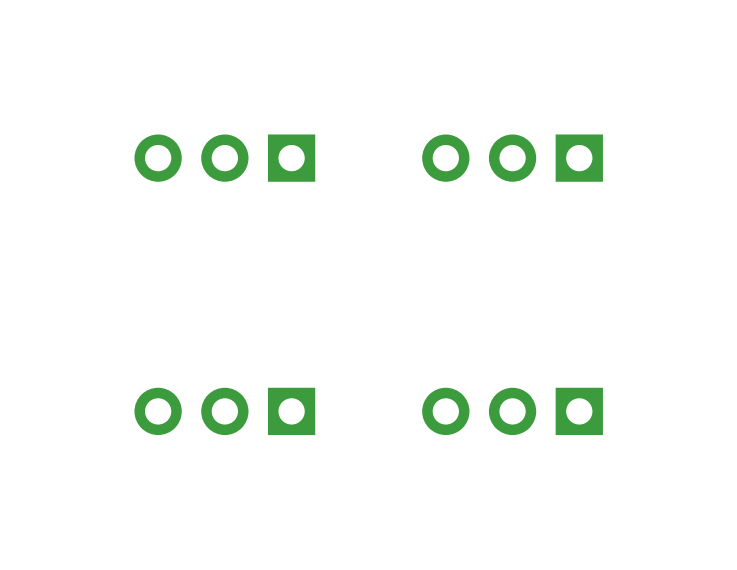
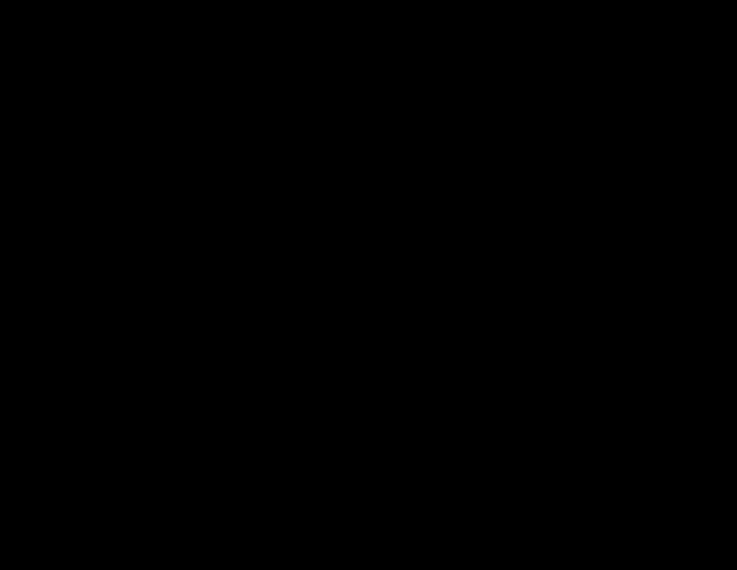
part: (224, 158) -> none
part: (512, 158) -> none
part: (224, 411) -> none
part: (512, 411) -> none

